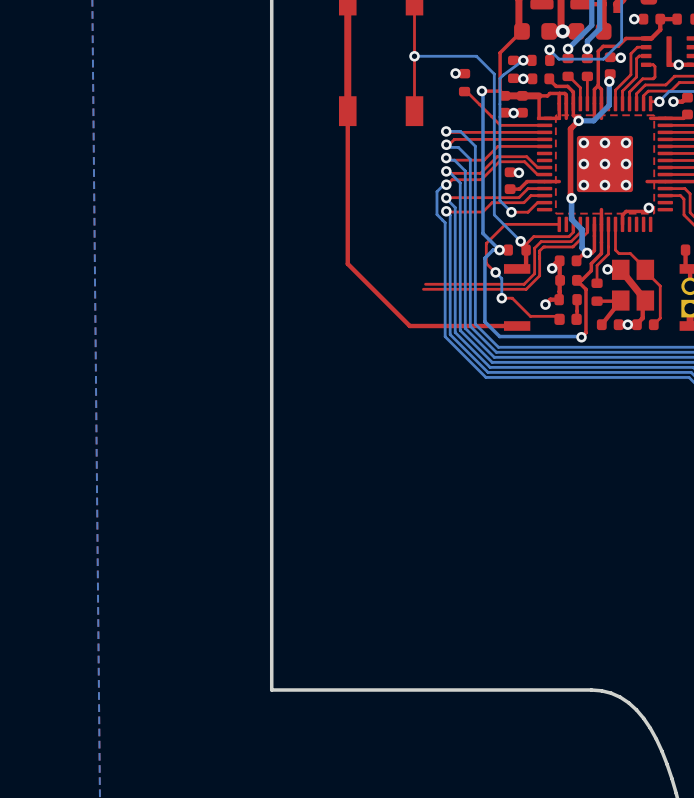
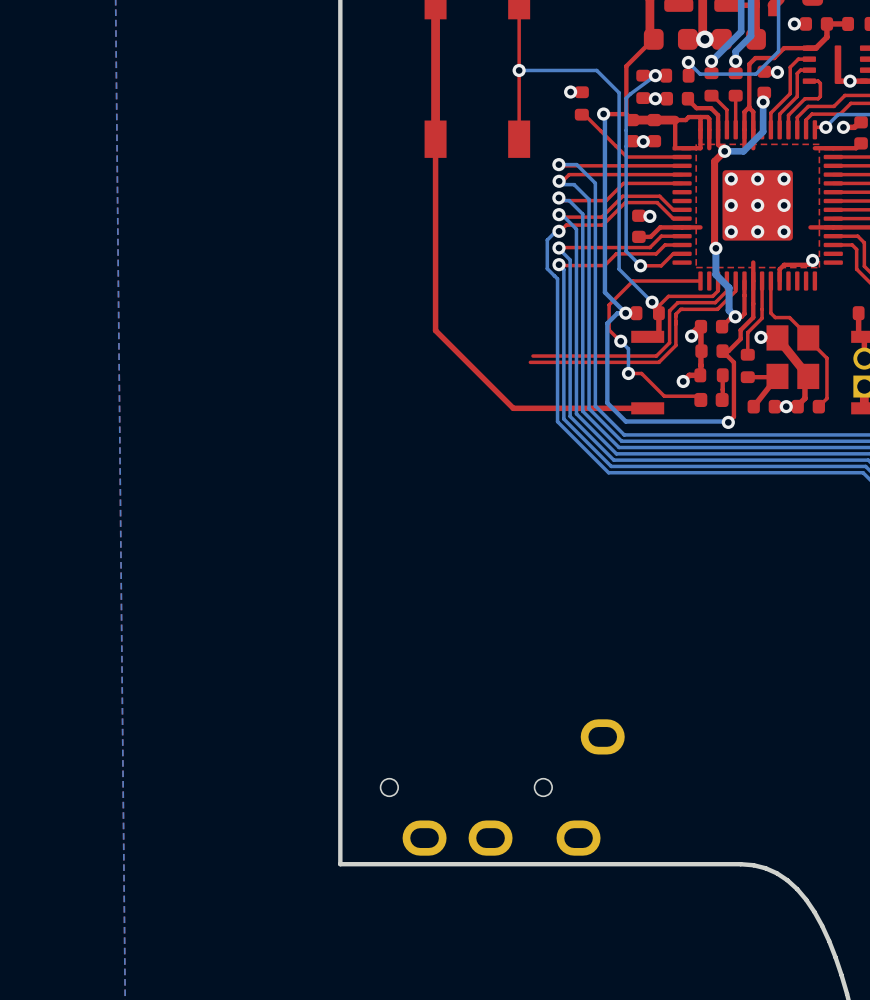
part: none -> (502, 787)

